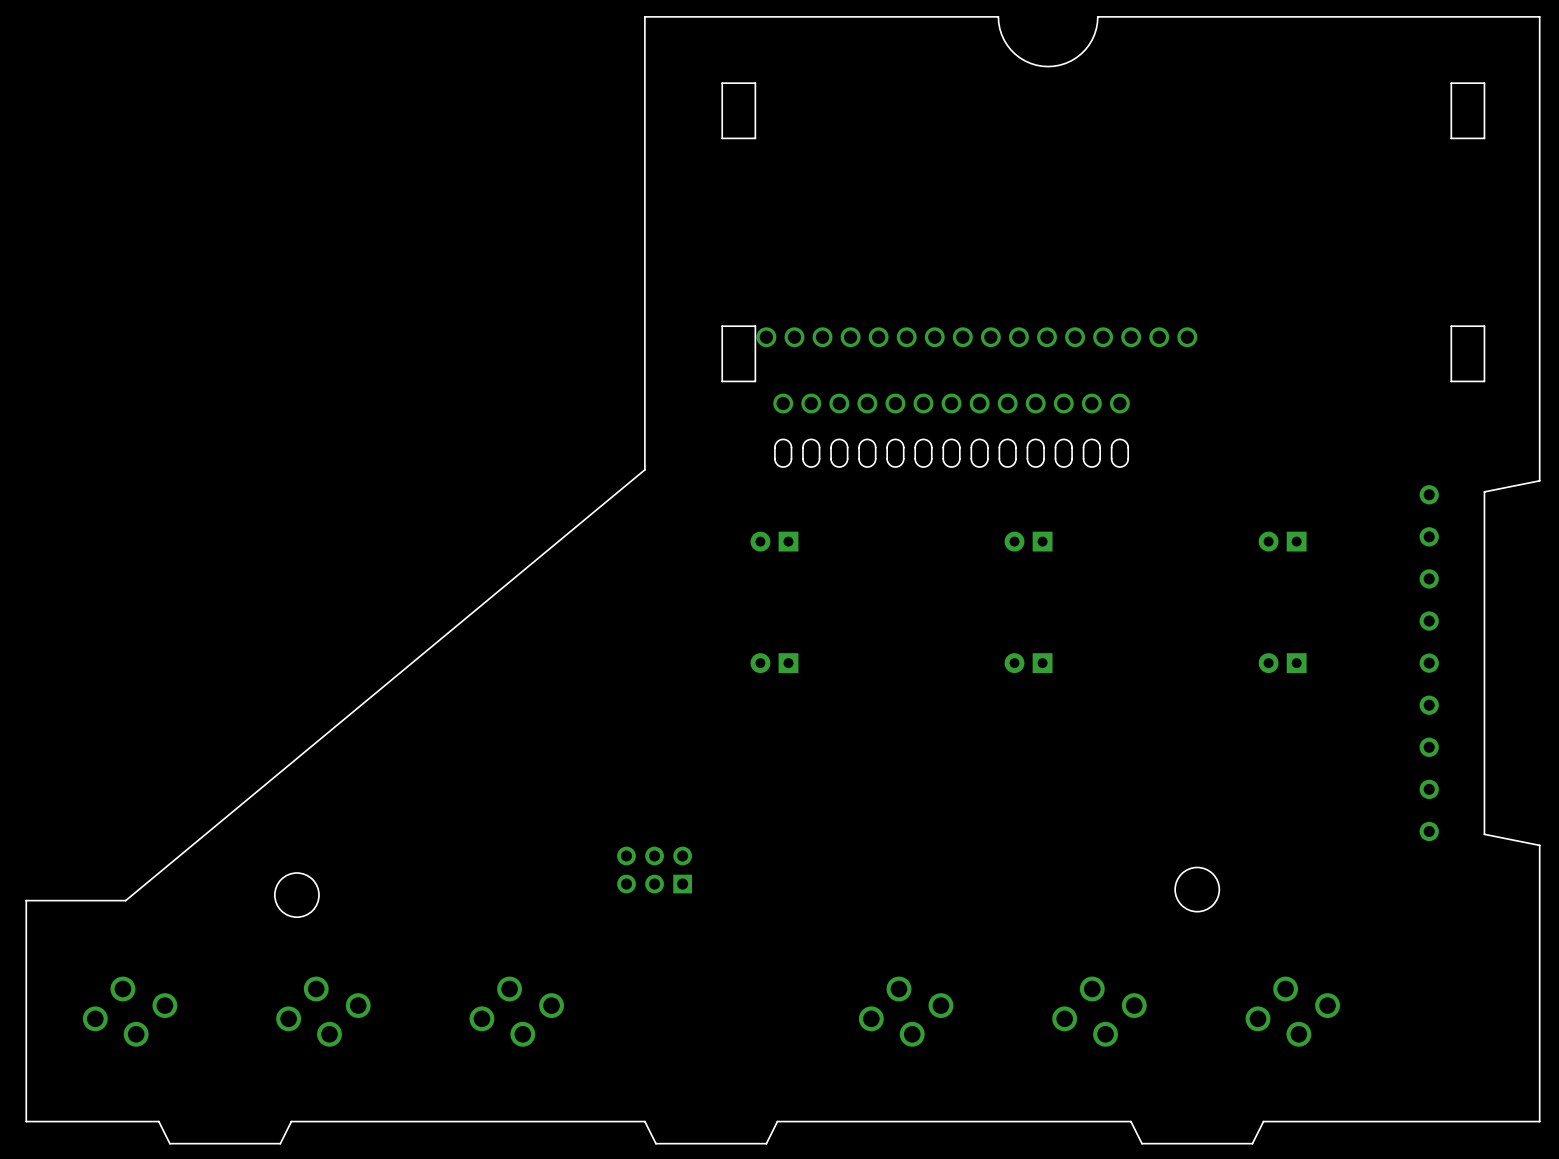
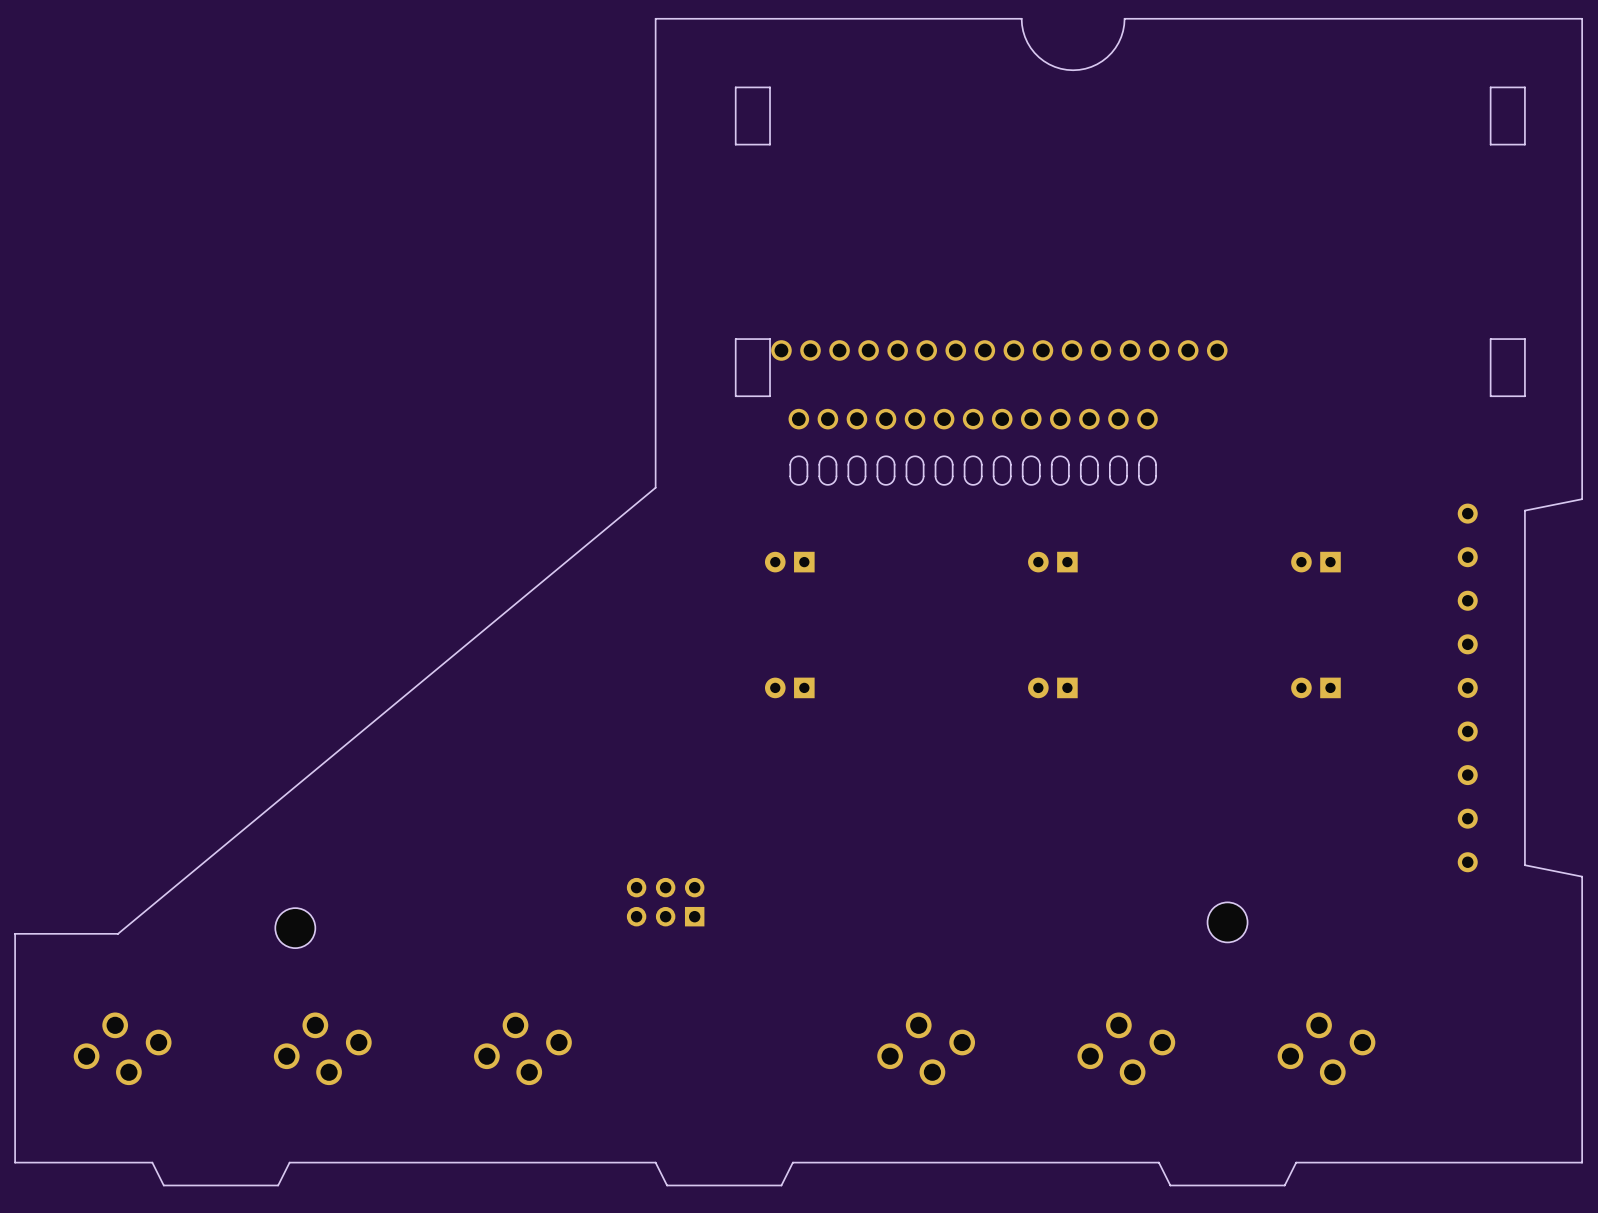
round board edge: [1174, 867, 1220, 912] -> none
round board edge: [274, 872, 320, 918] -> none
part: none -> (1227, 922)
part: none -> (295, 928)

